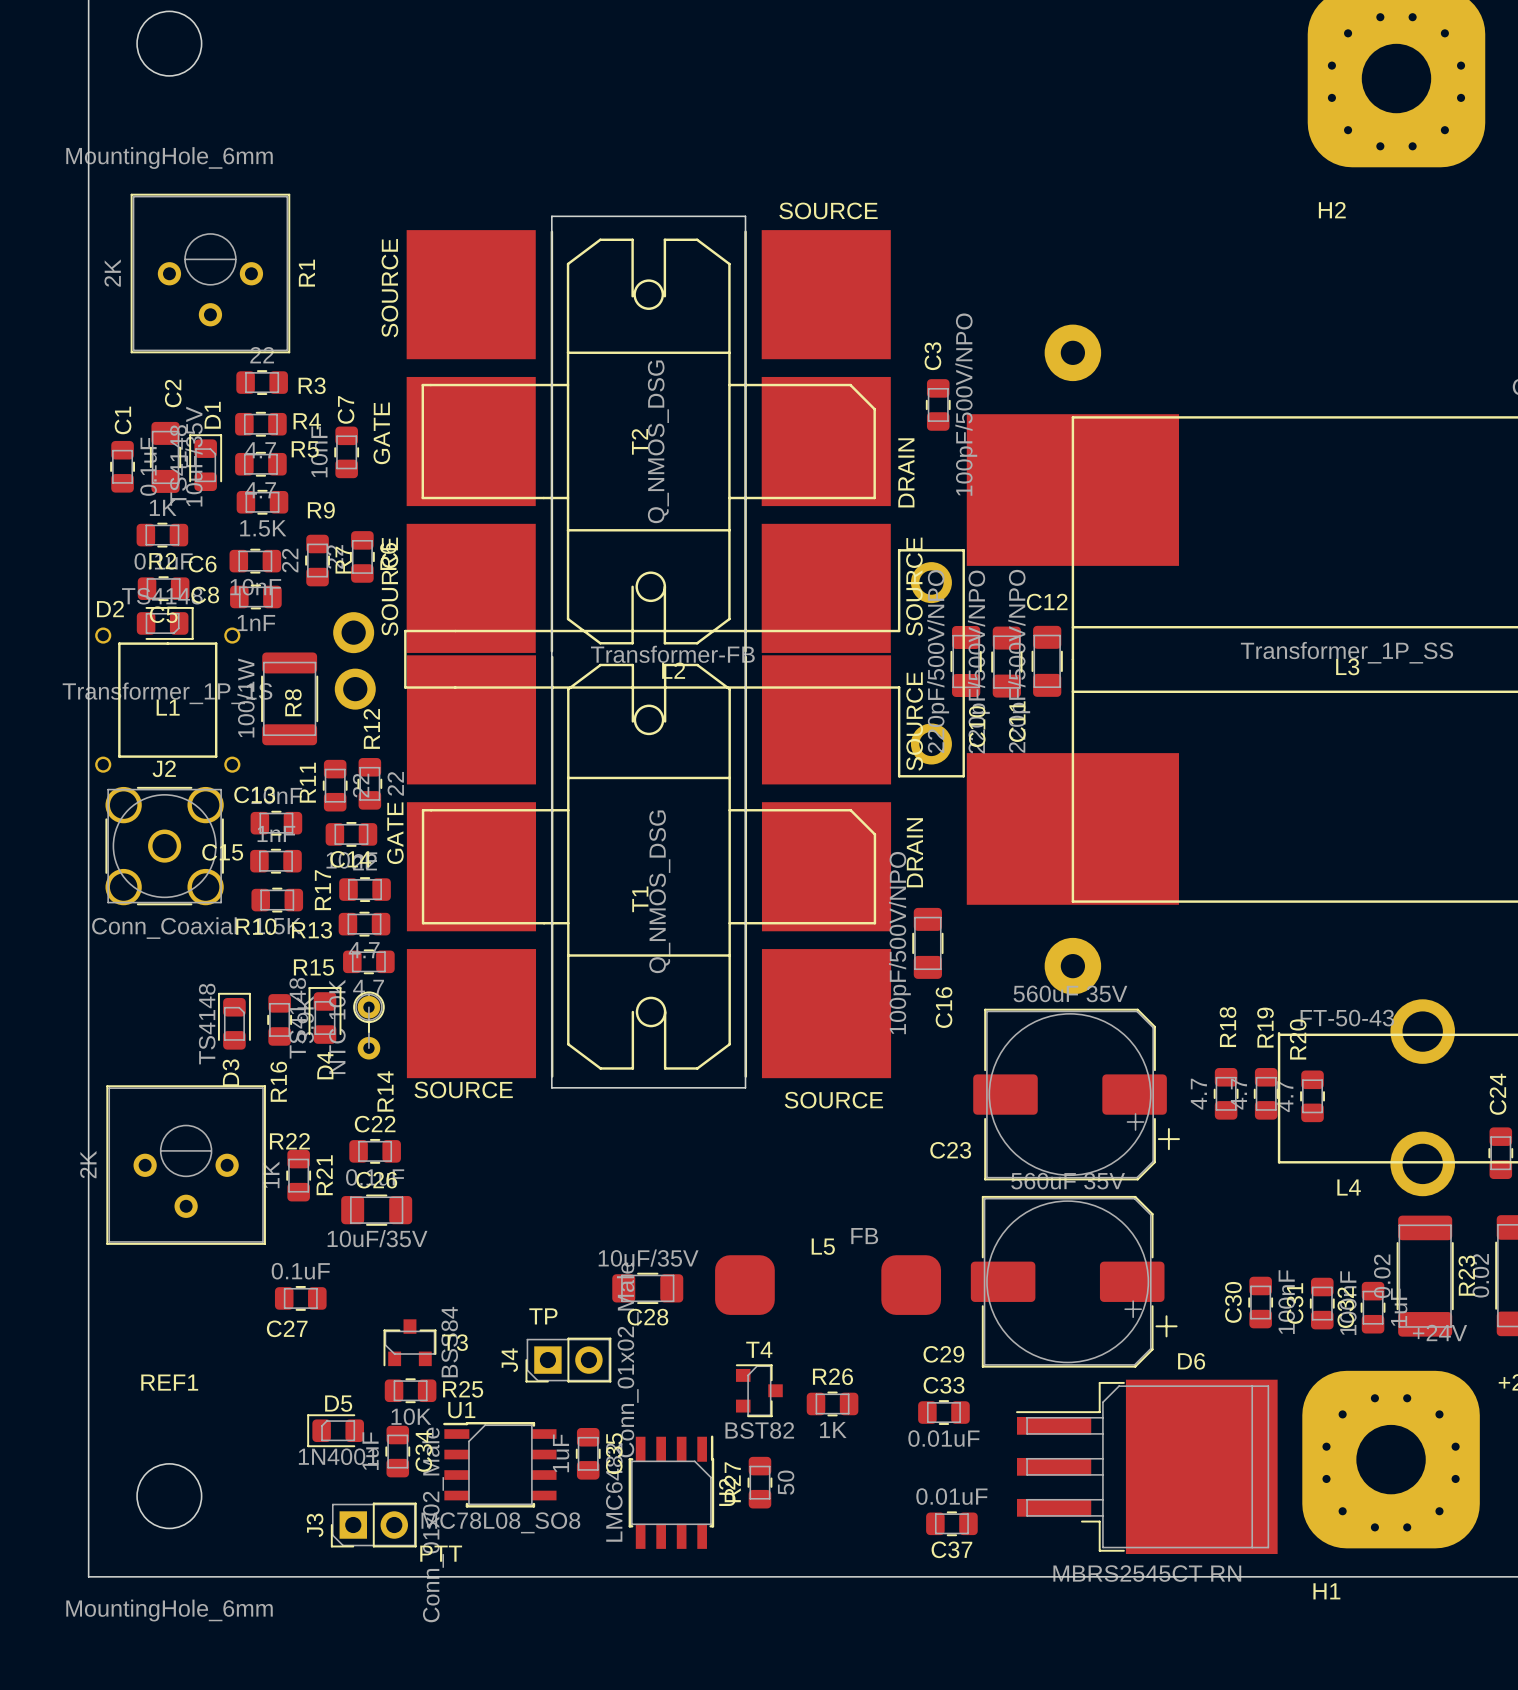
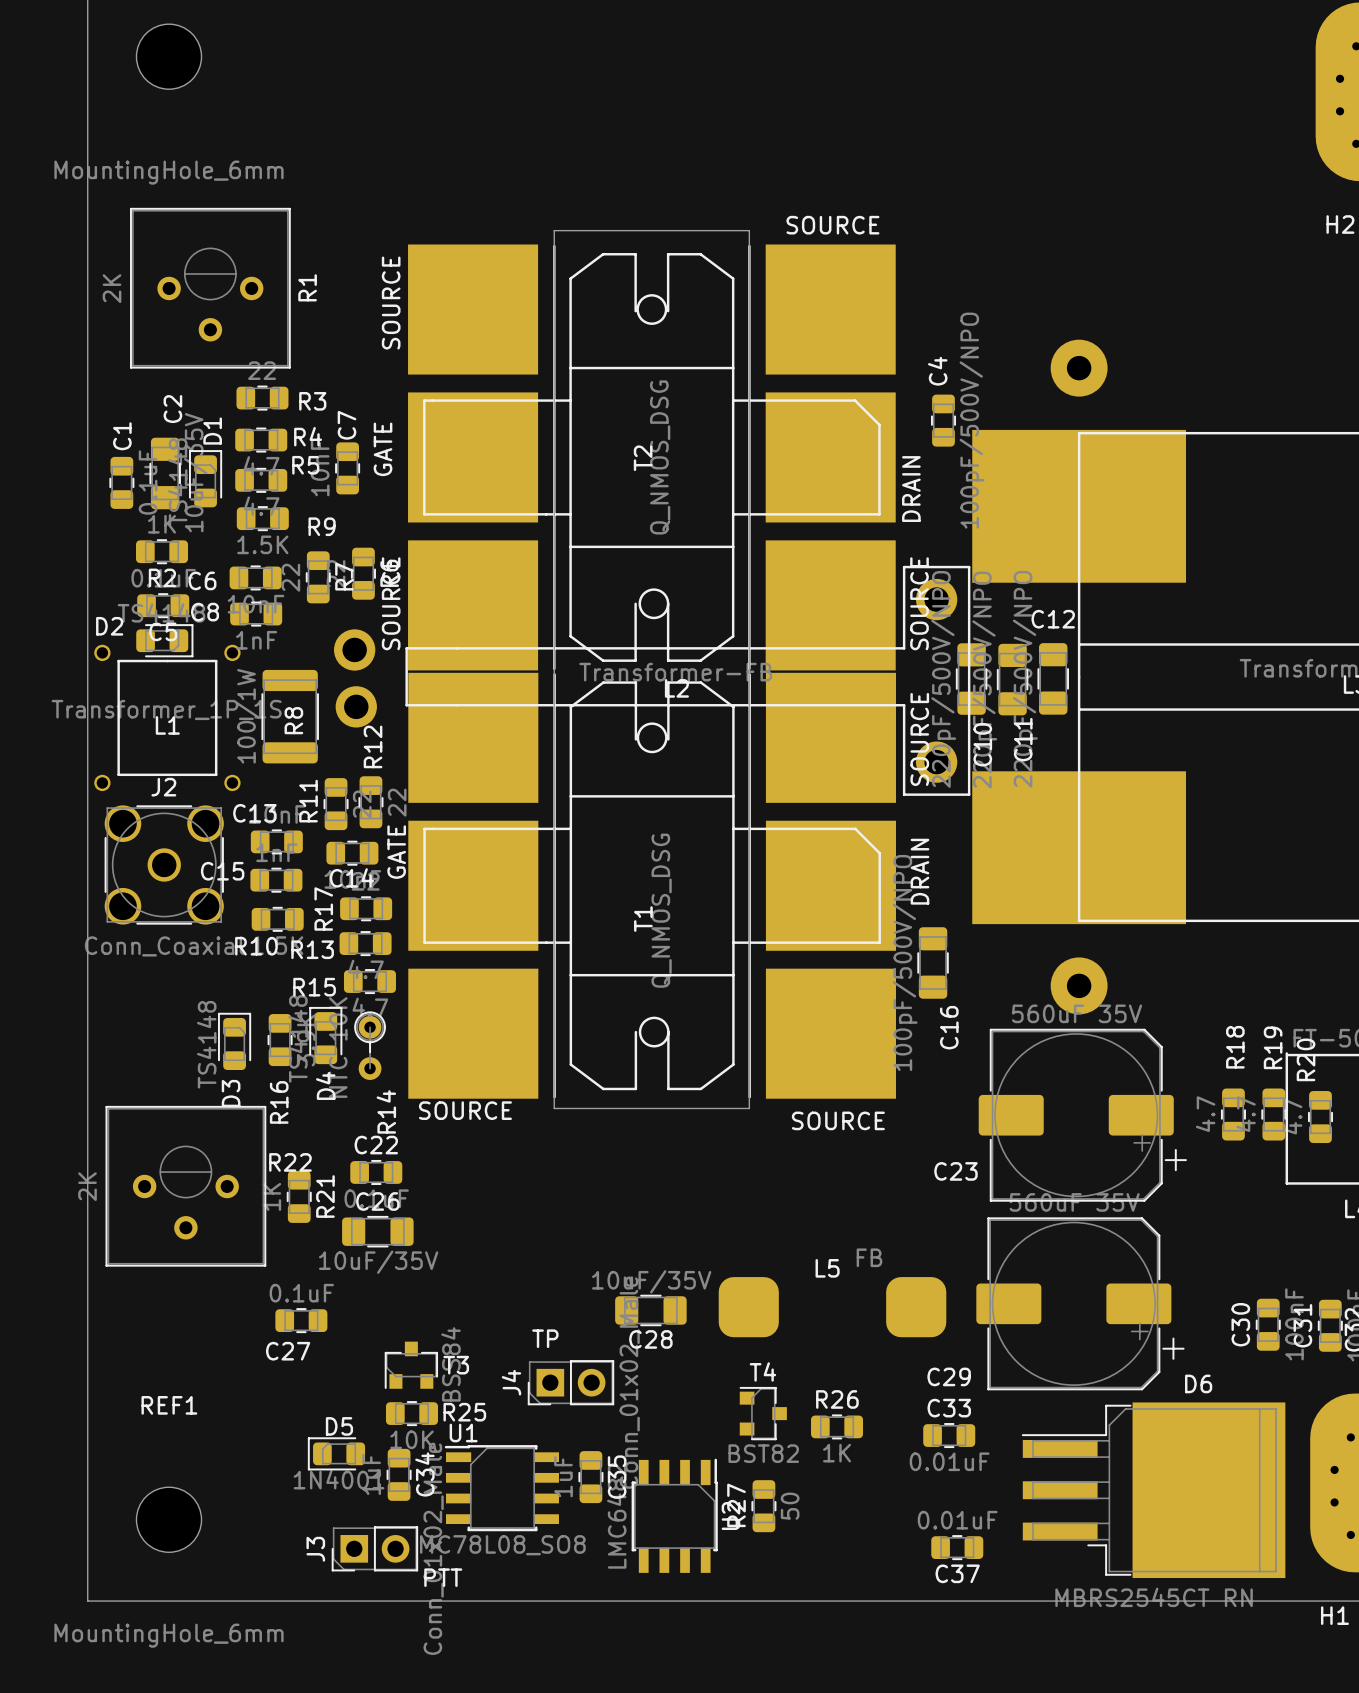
C3 name: C3 (932, 356) -> C4 (937, 371)

